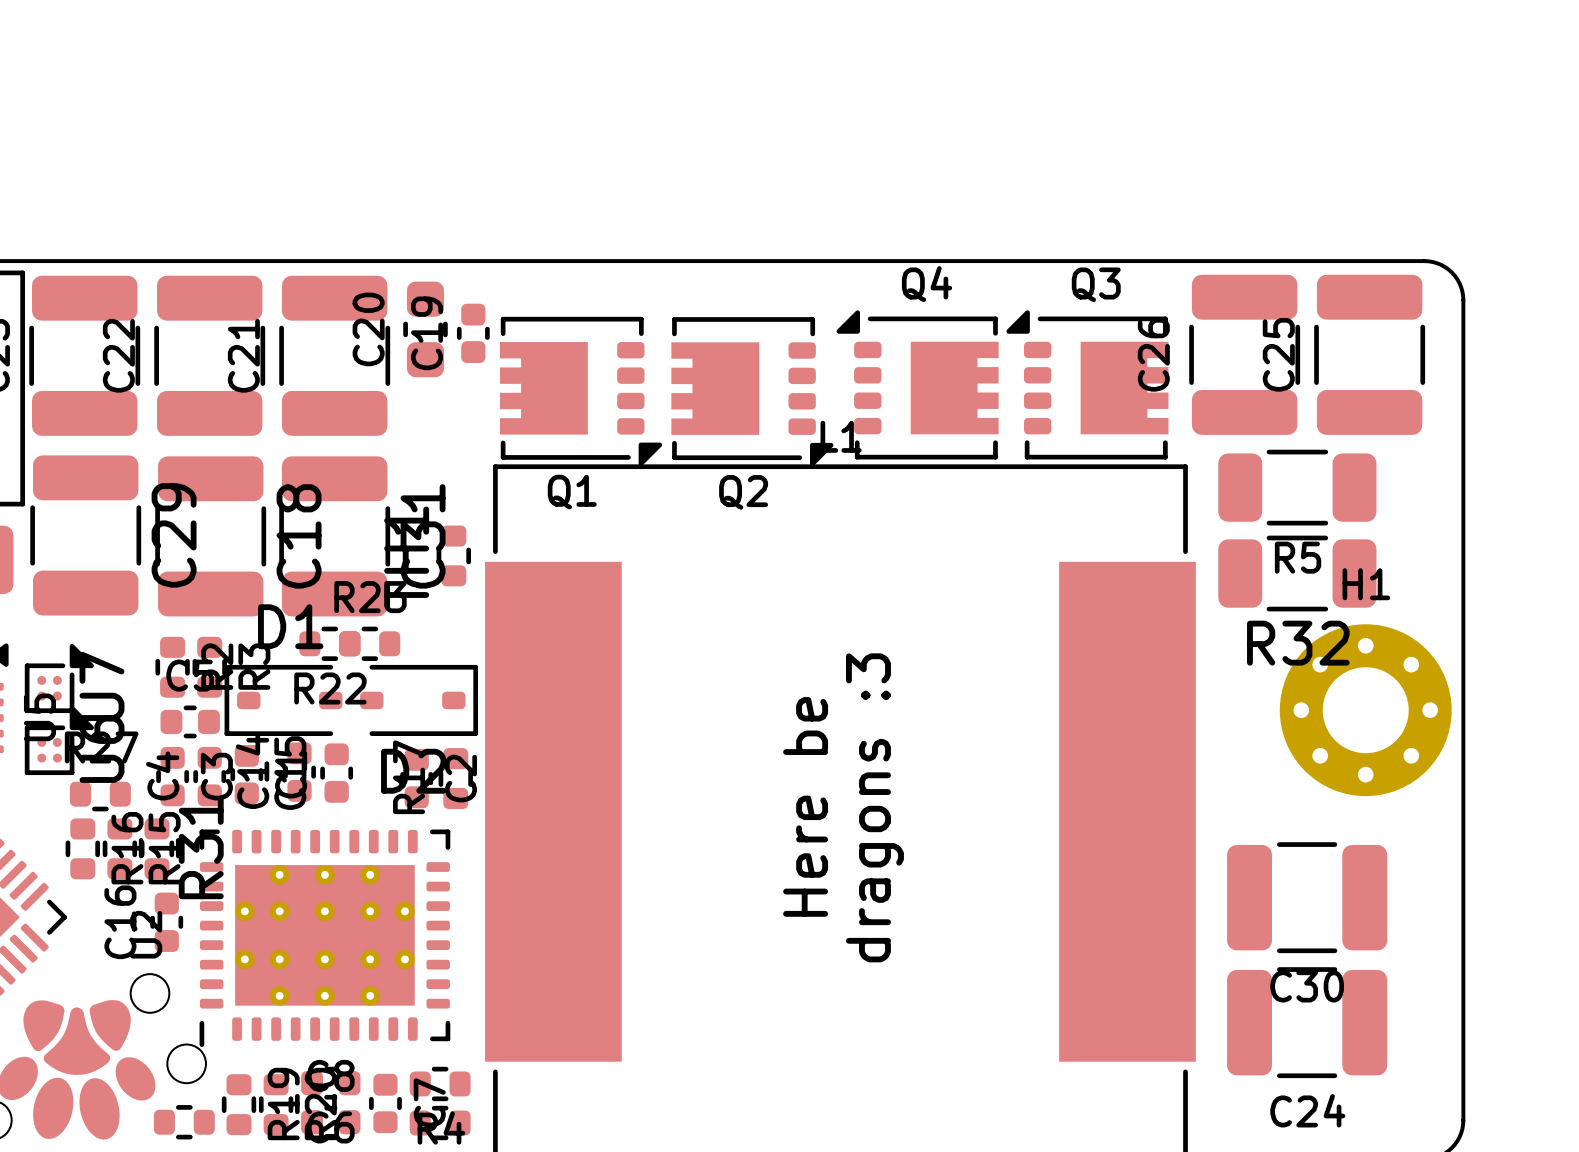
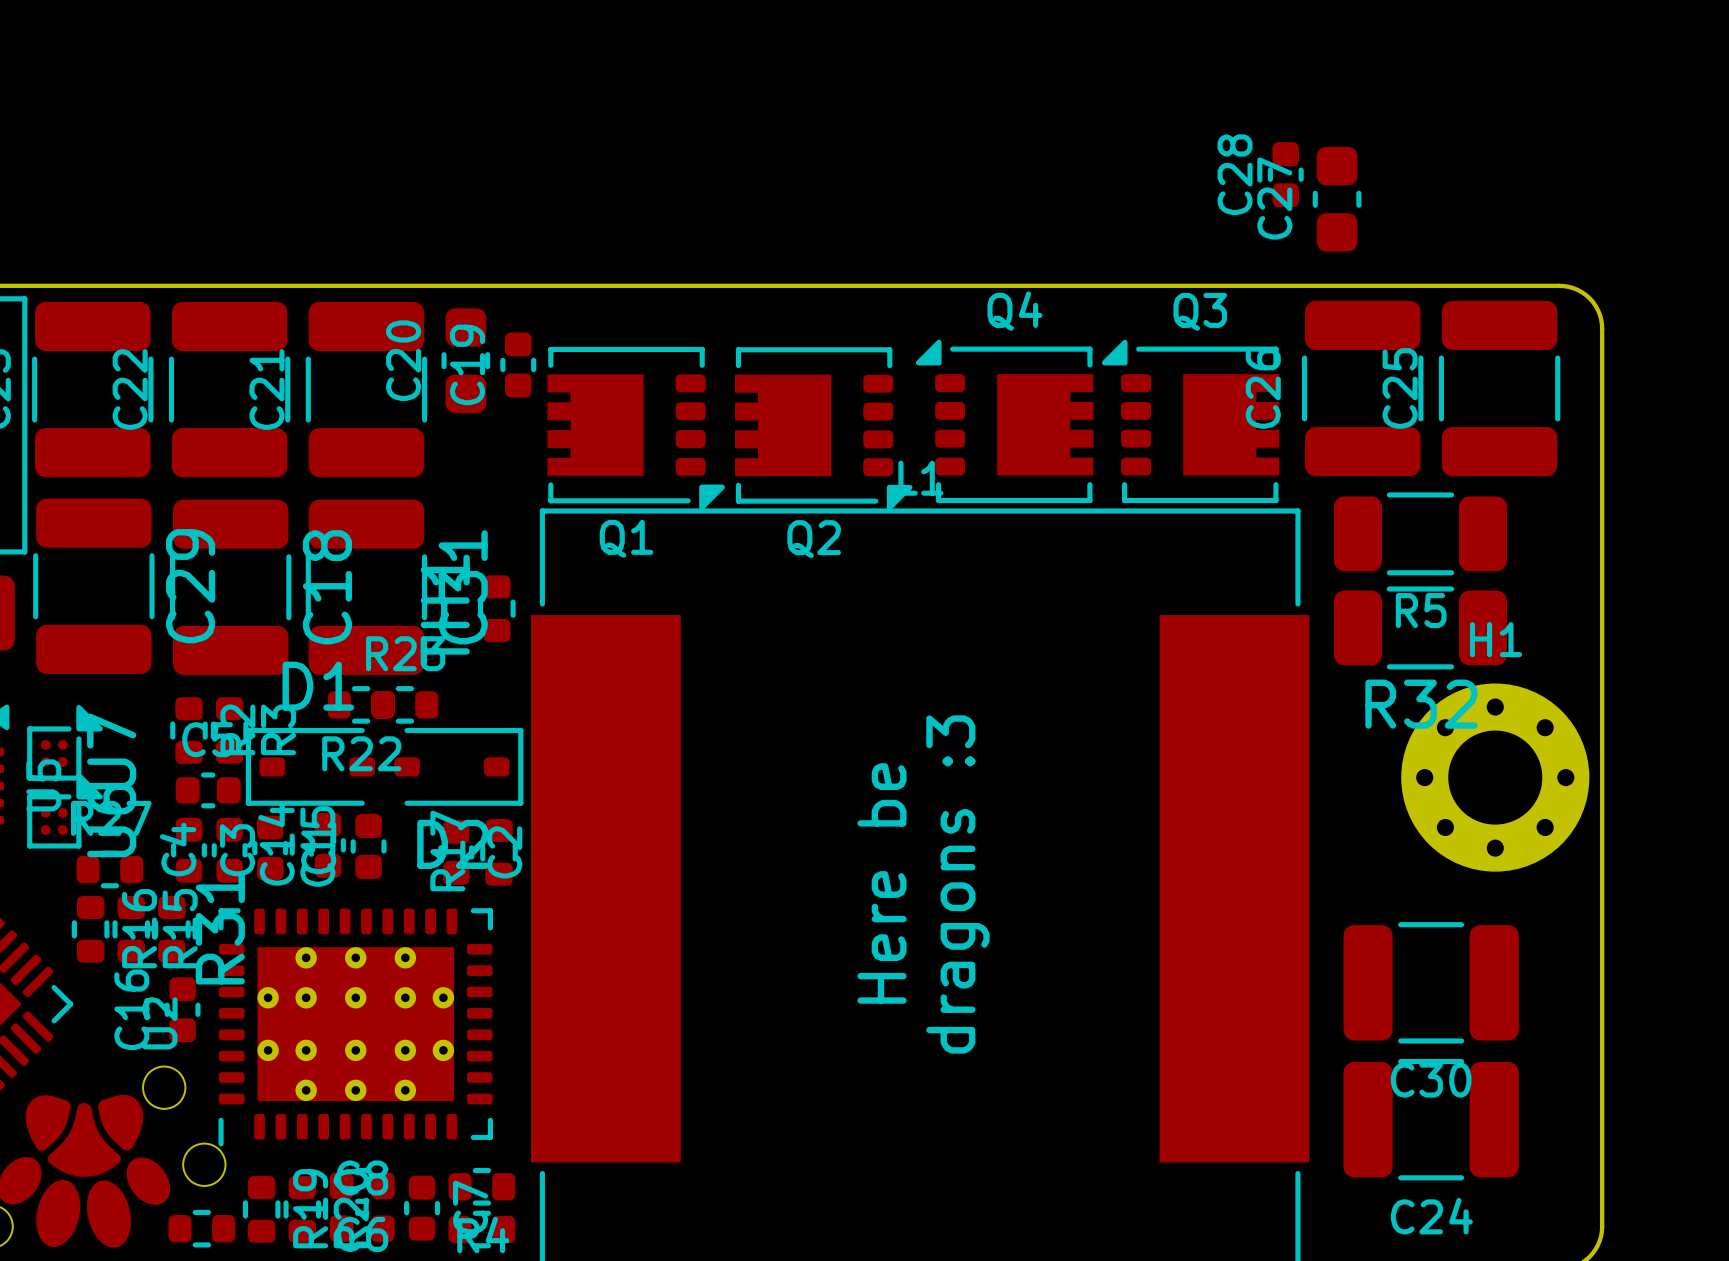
C28: none -> (1285, 174)
C27: none -> (1337, 199)

